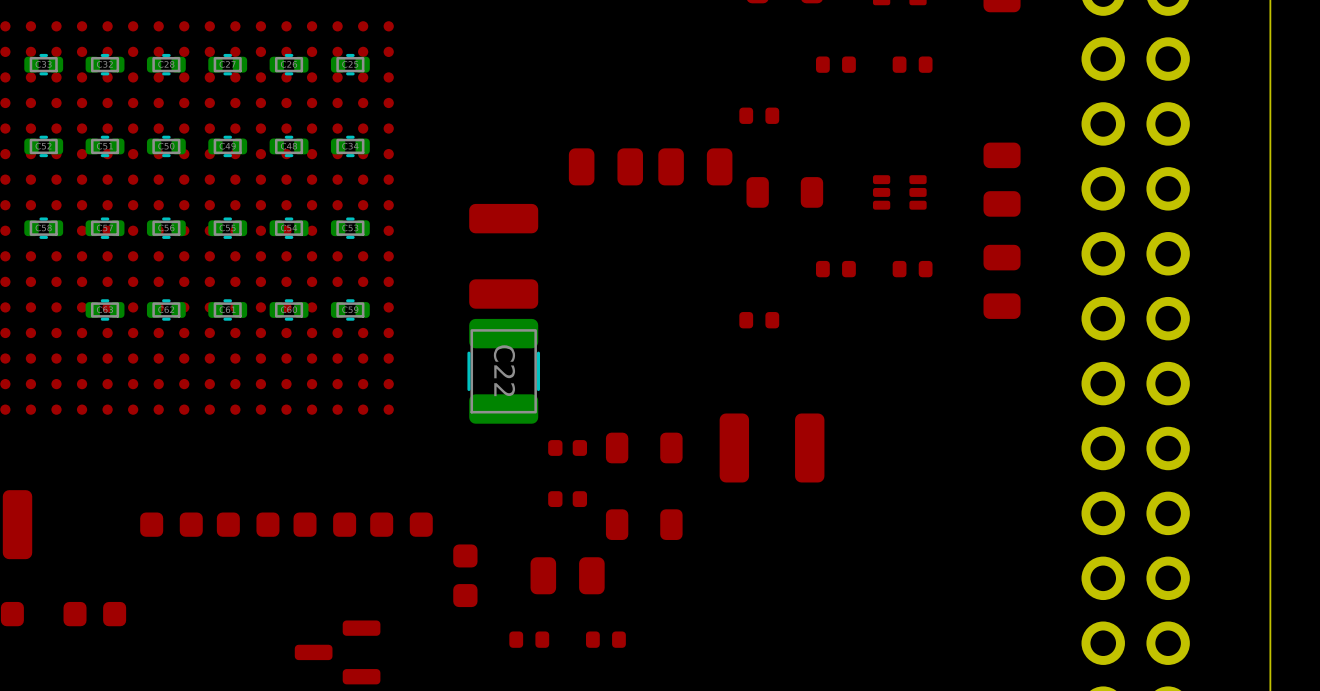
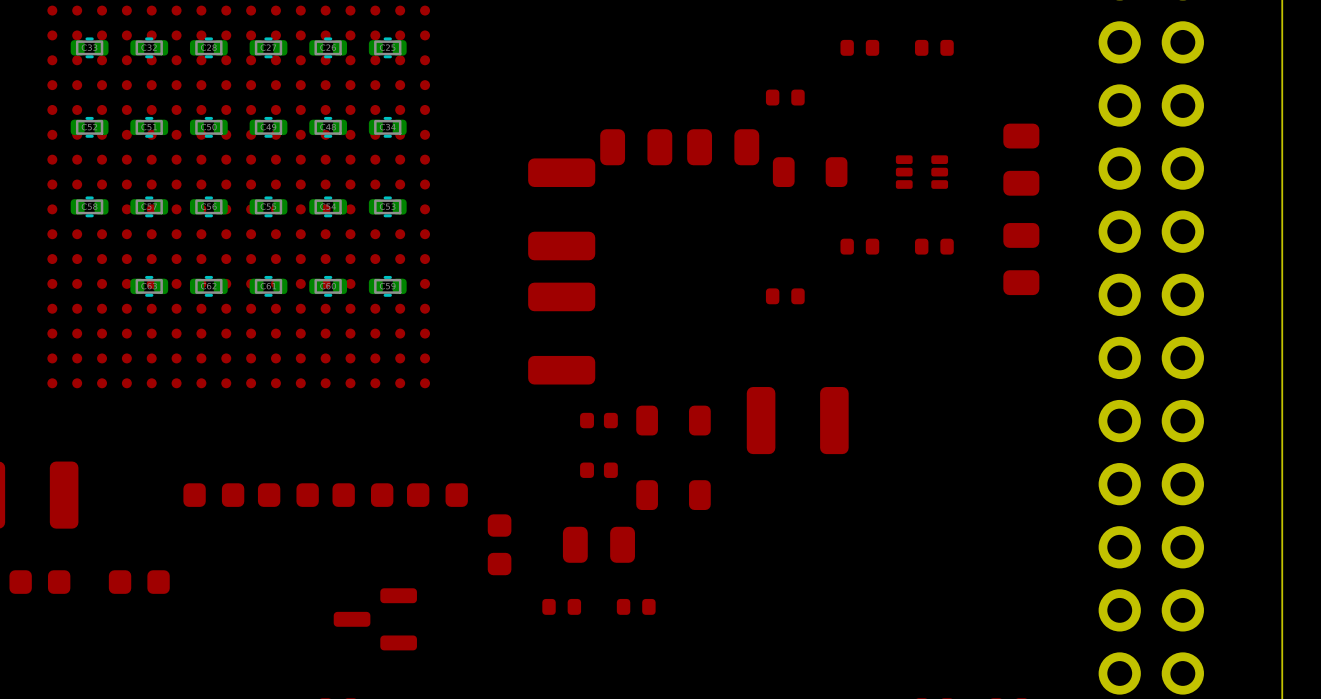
part position: (503, 256) -> (561, 209)
C22 side: bottom (503, 371) -> top (561, 333)

